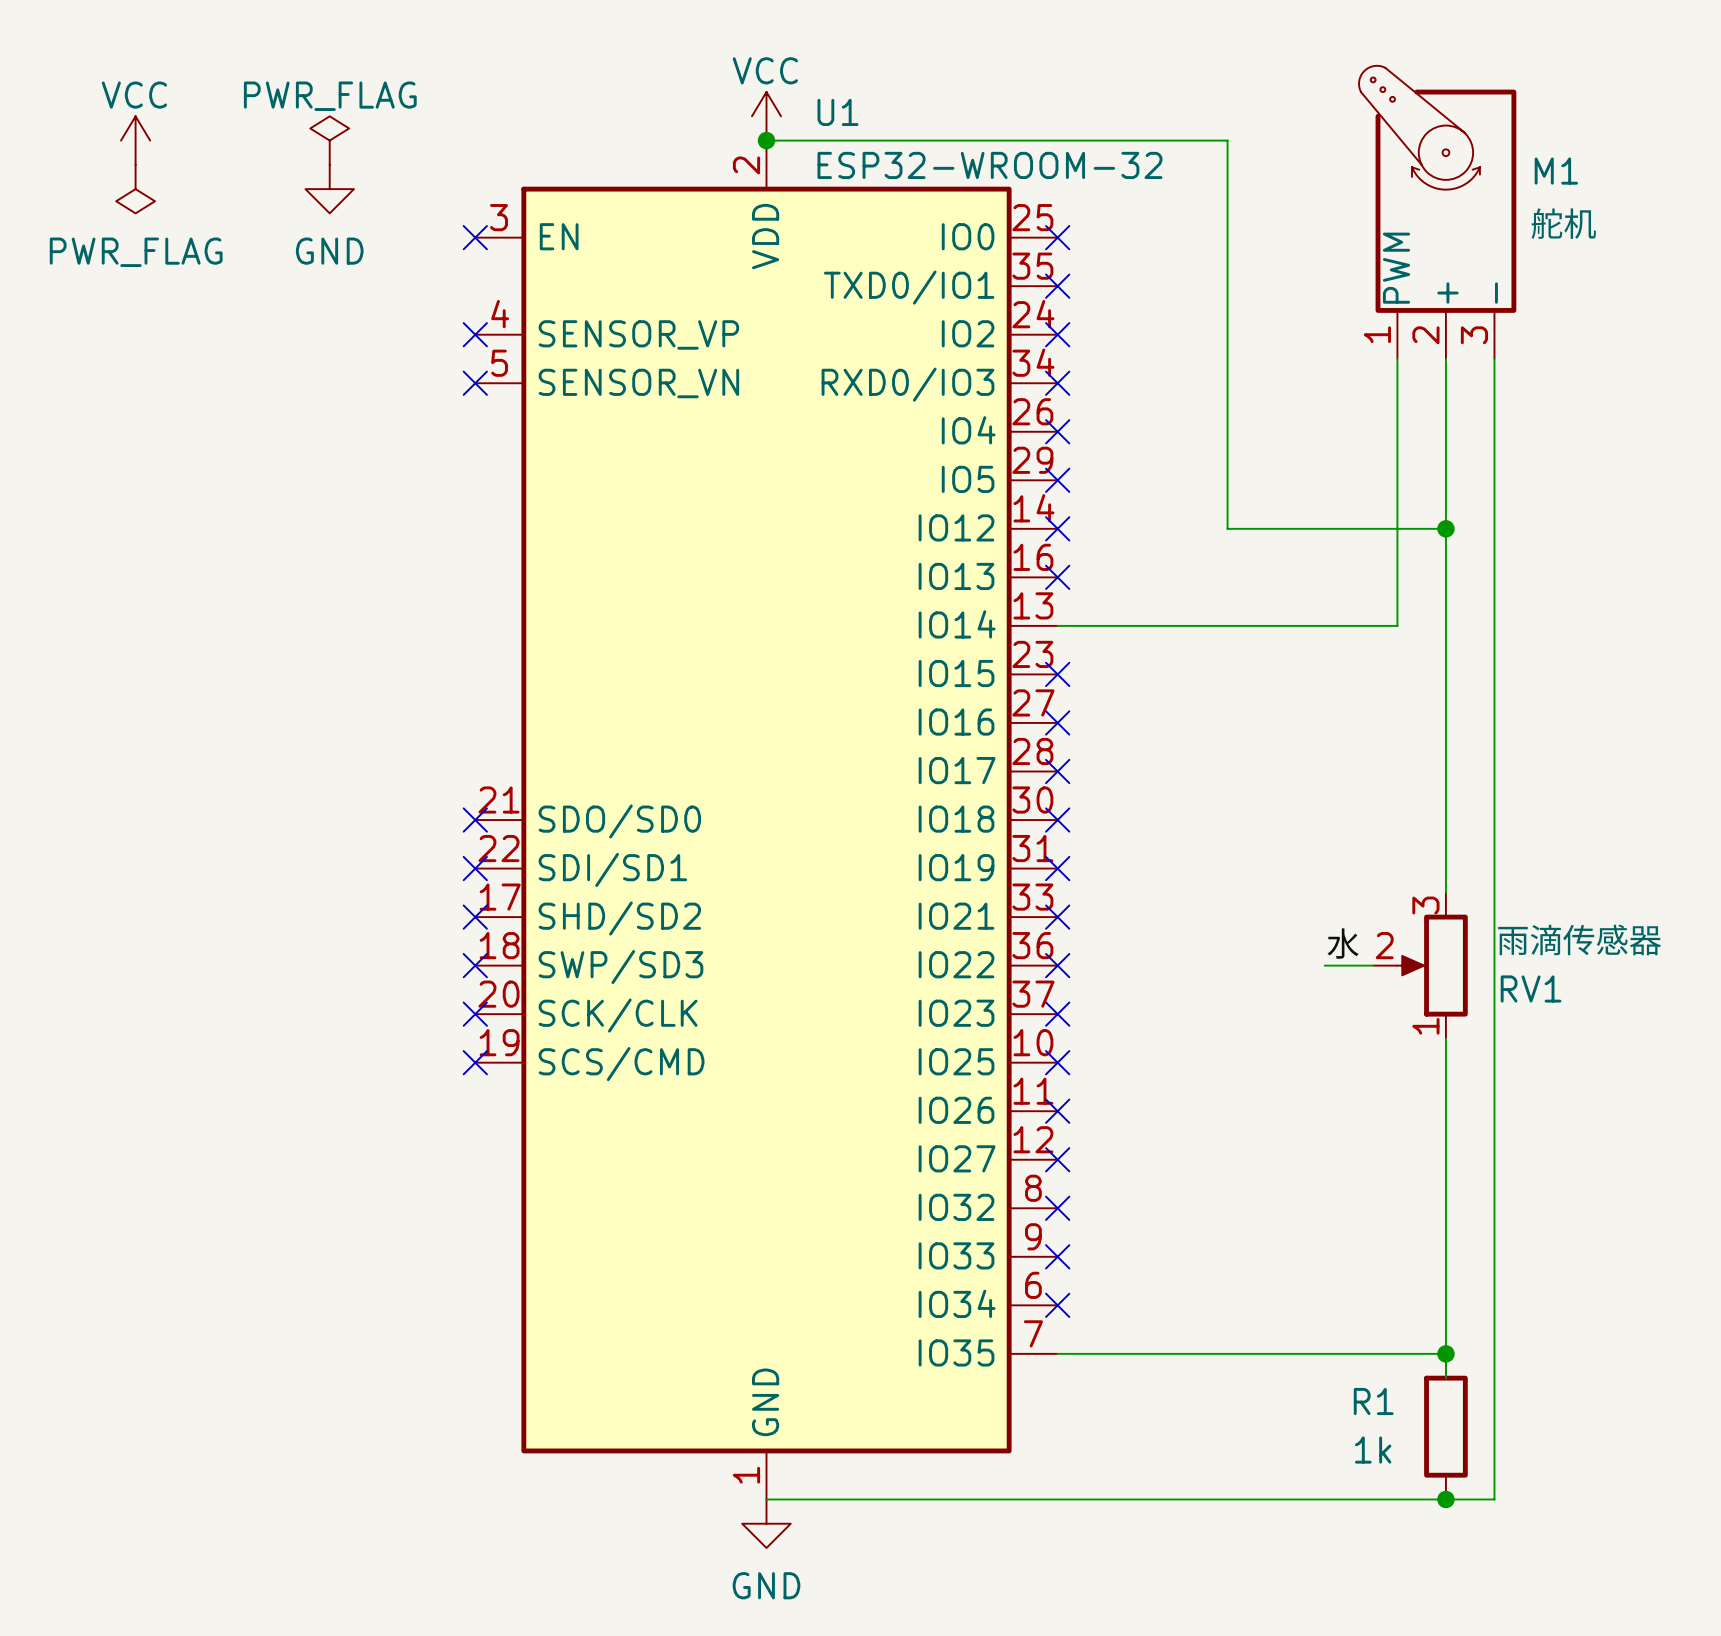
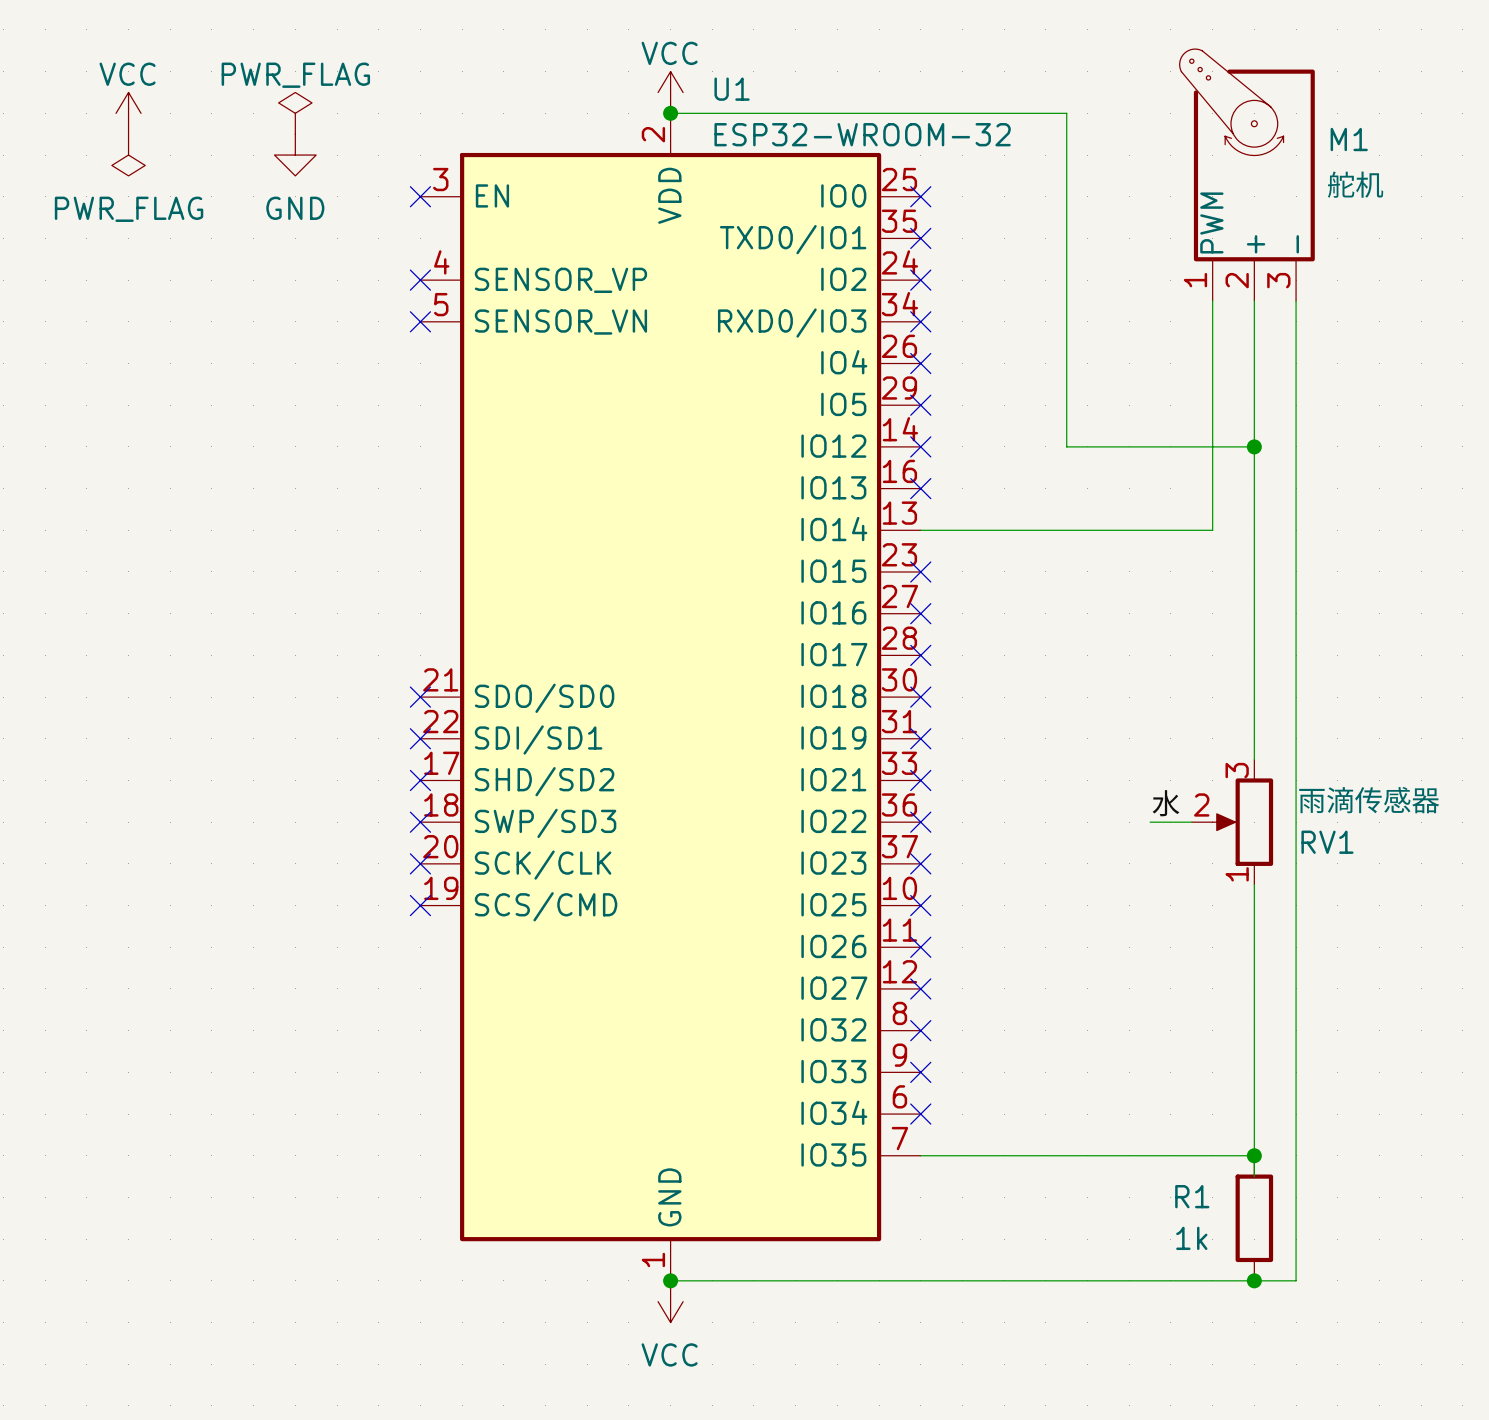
junction: none -> (670, 1280)
power symbol: GND (766, 1523) -> VCC (670, 1301)

